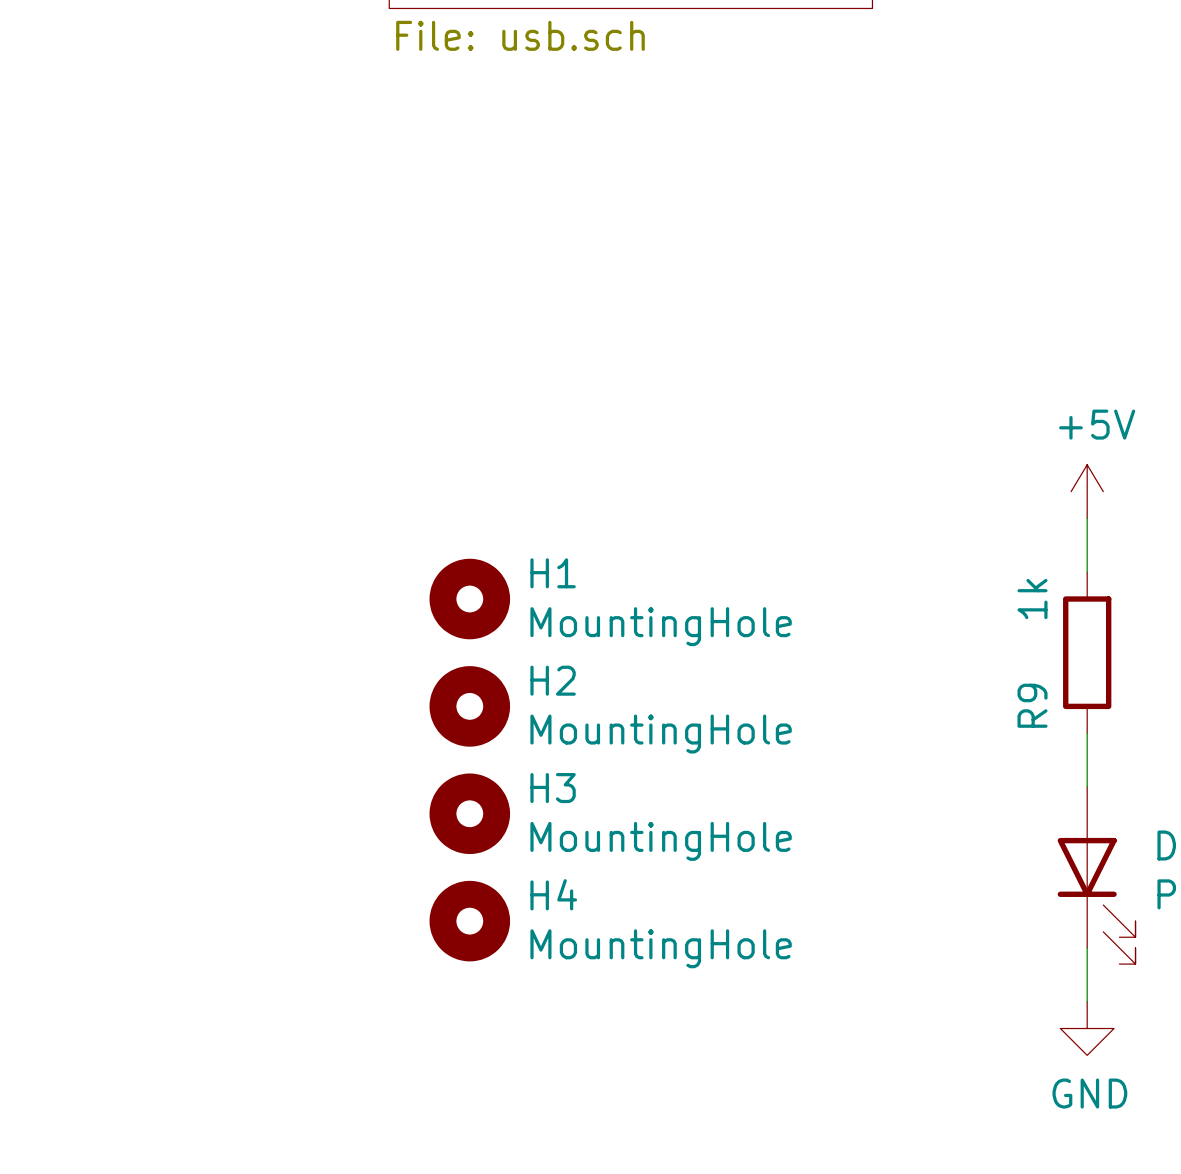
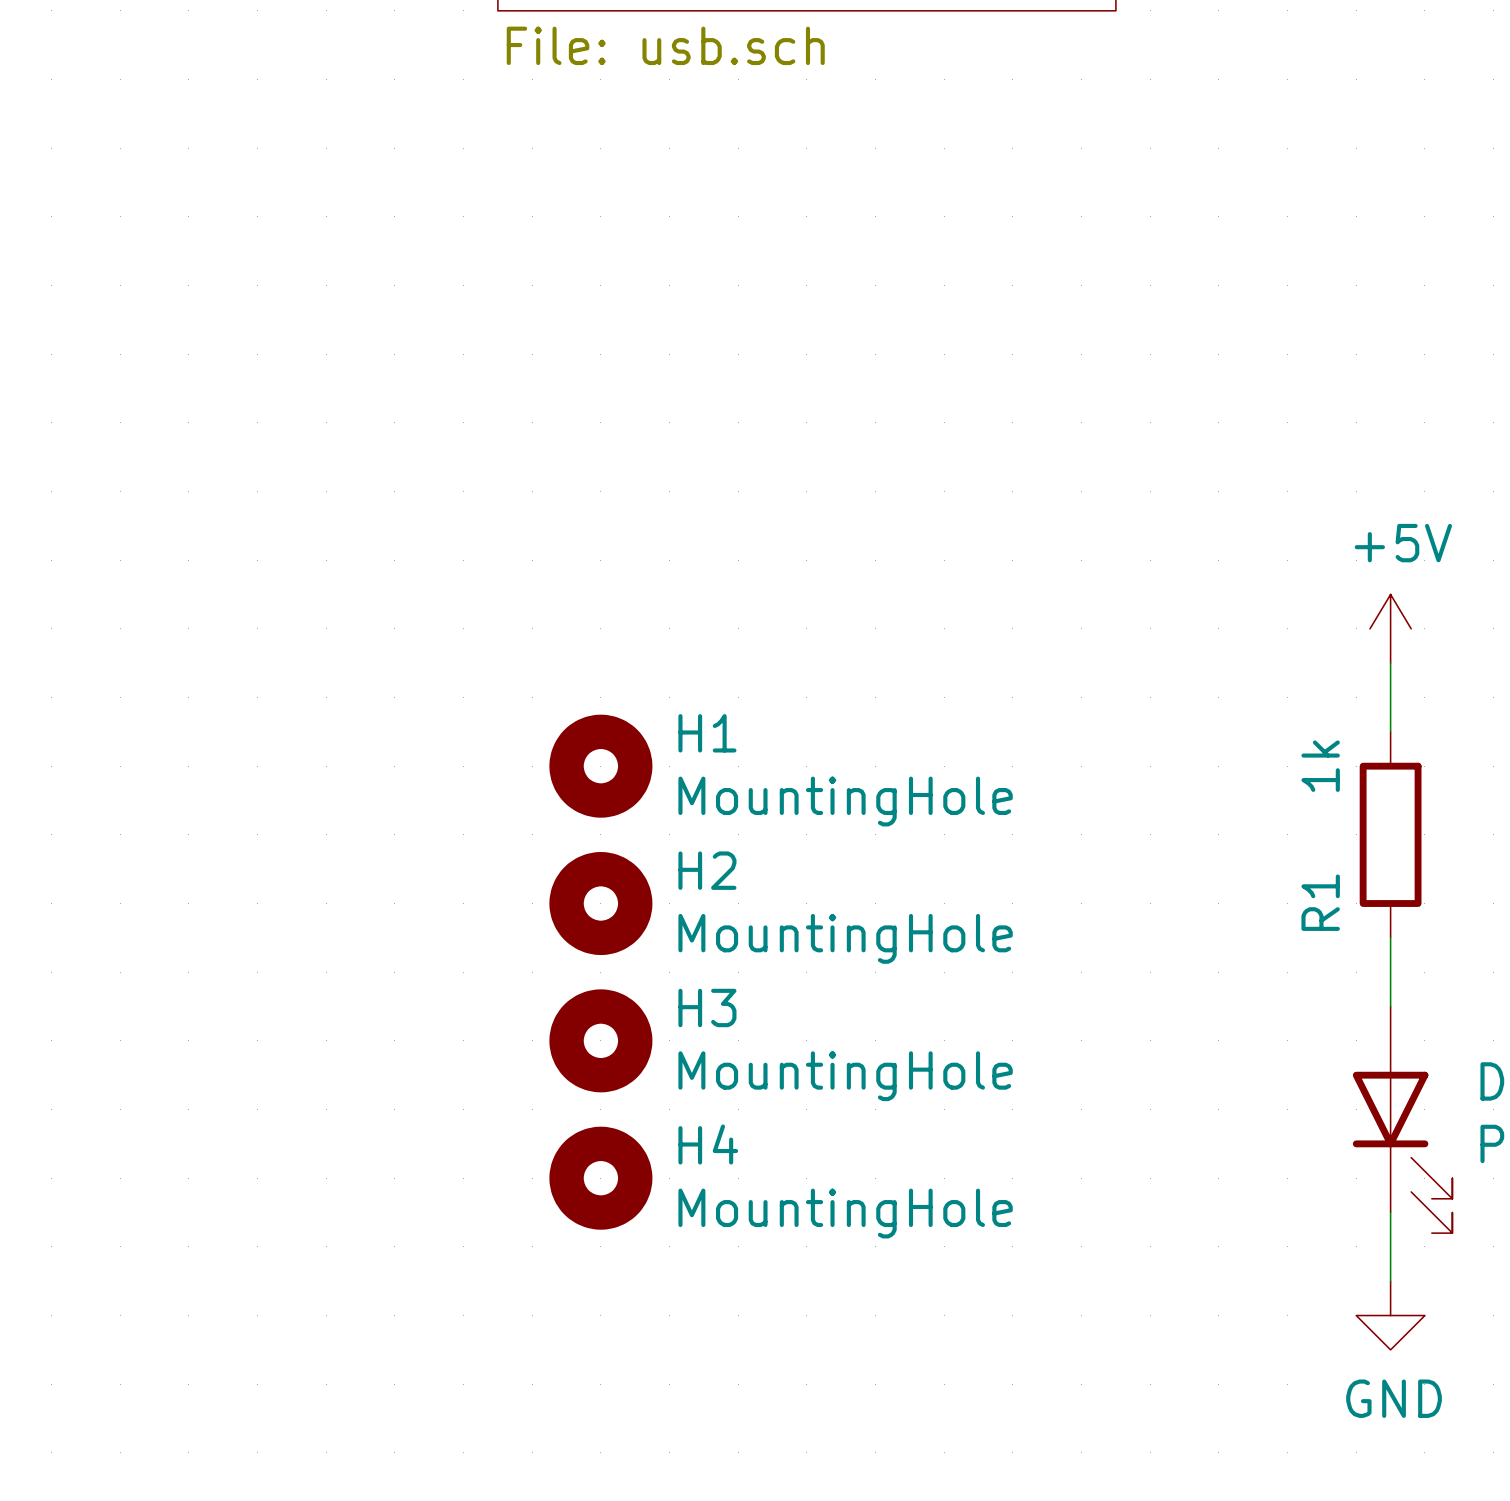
R9 name: R9 (1032, 705) -> R1 (1320, 902)

